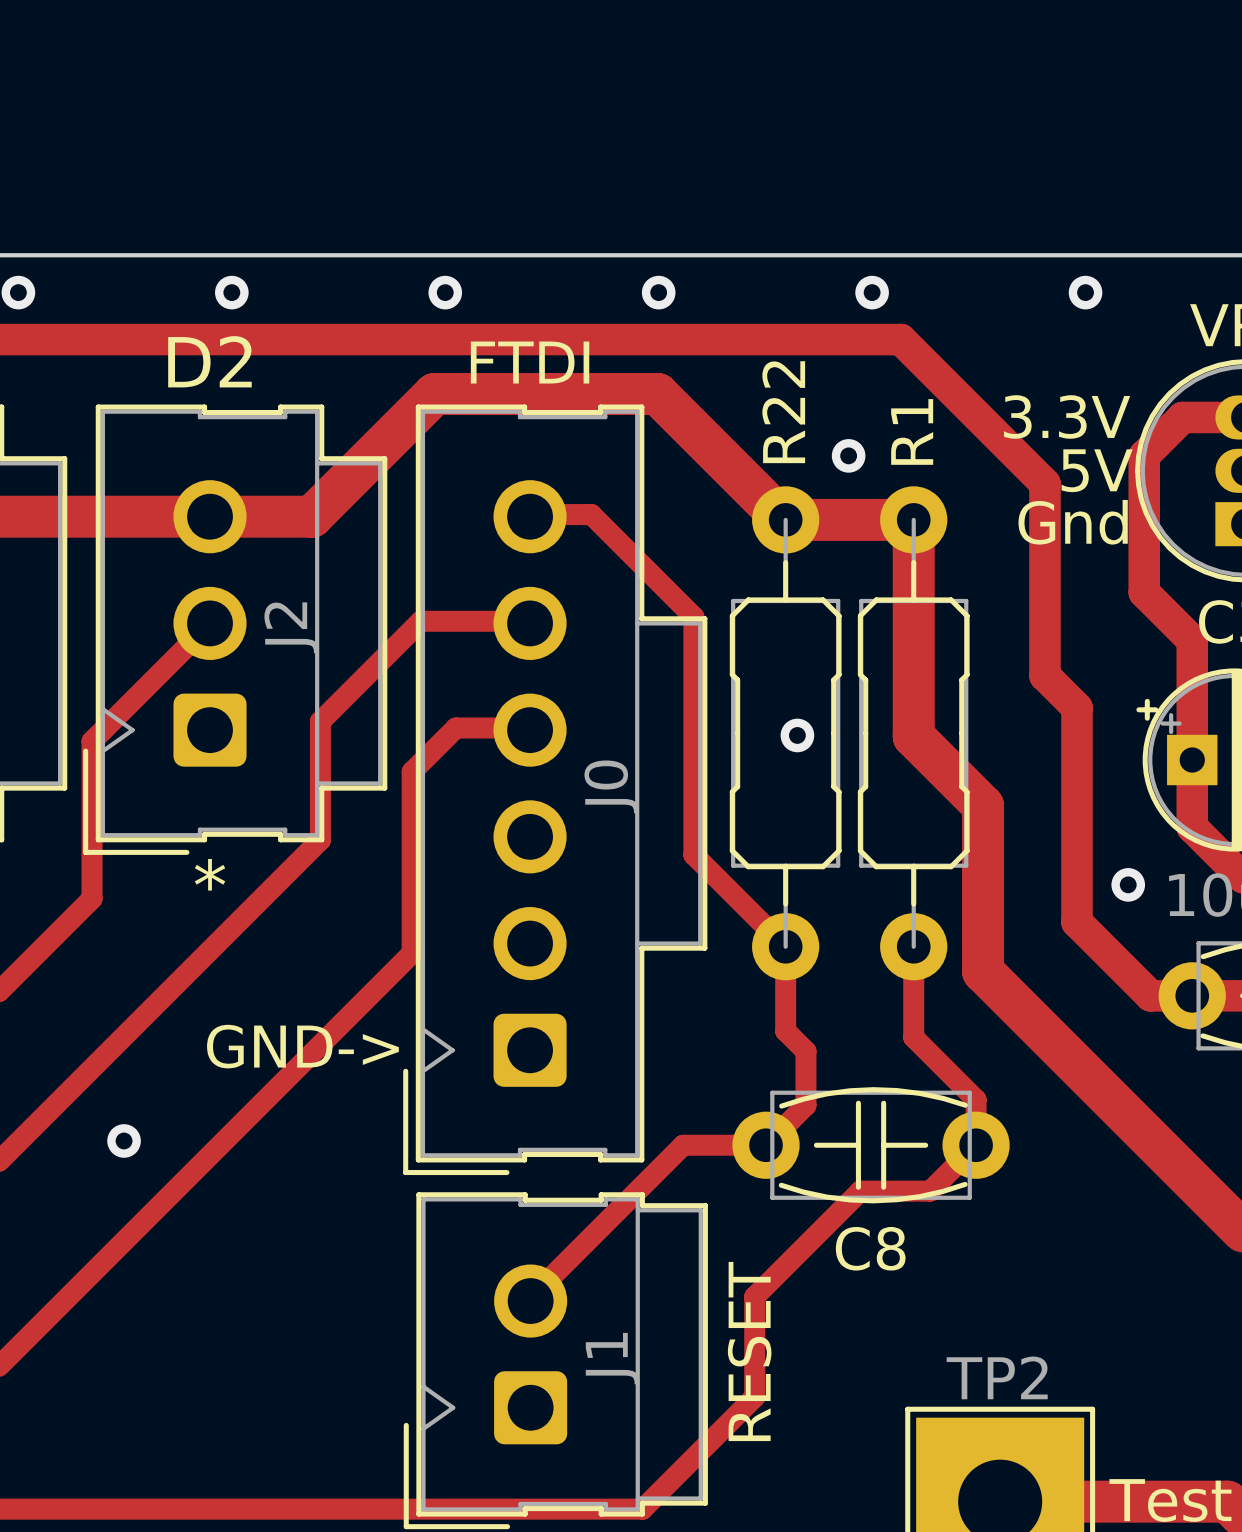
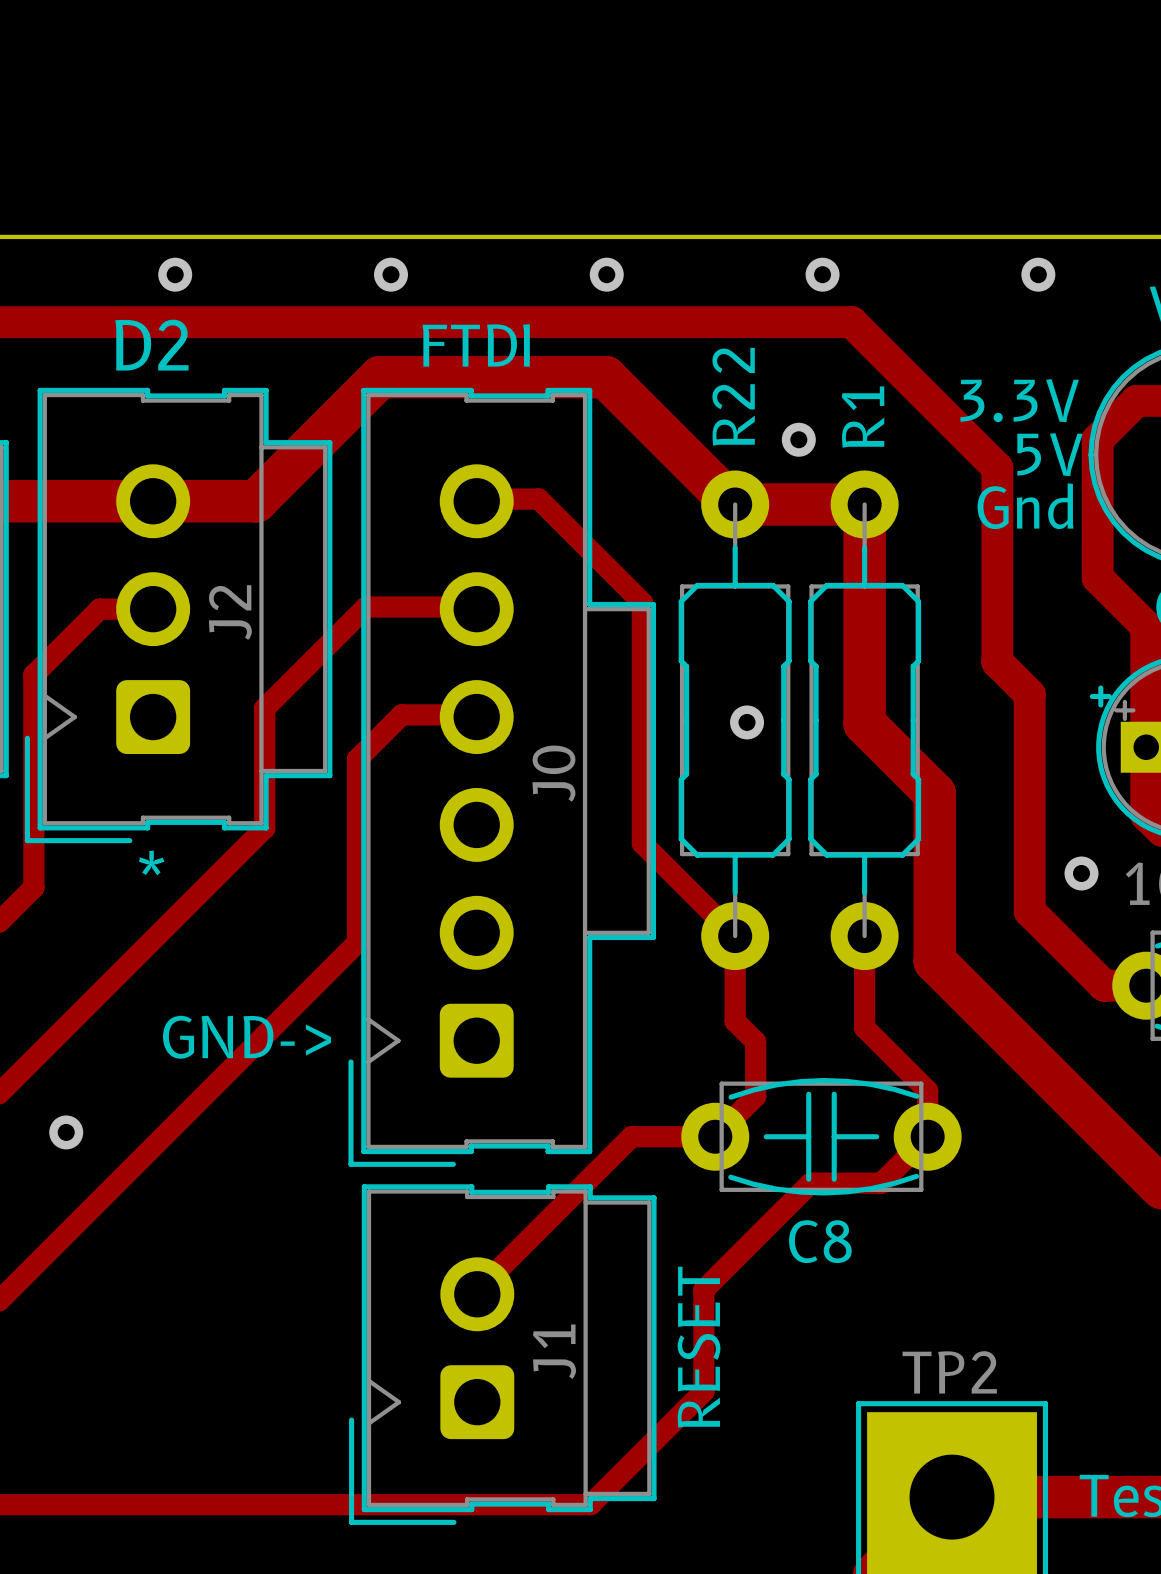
top track: (210, 623) (92, 741) -> (153, 609) (99, 609) (33, 674) (33, 728)

